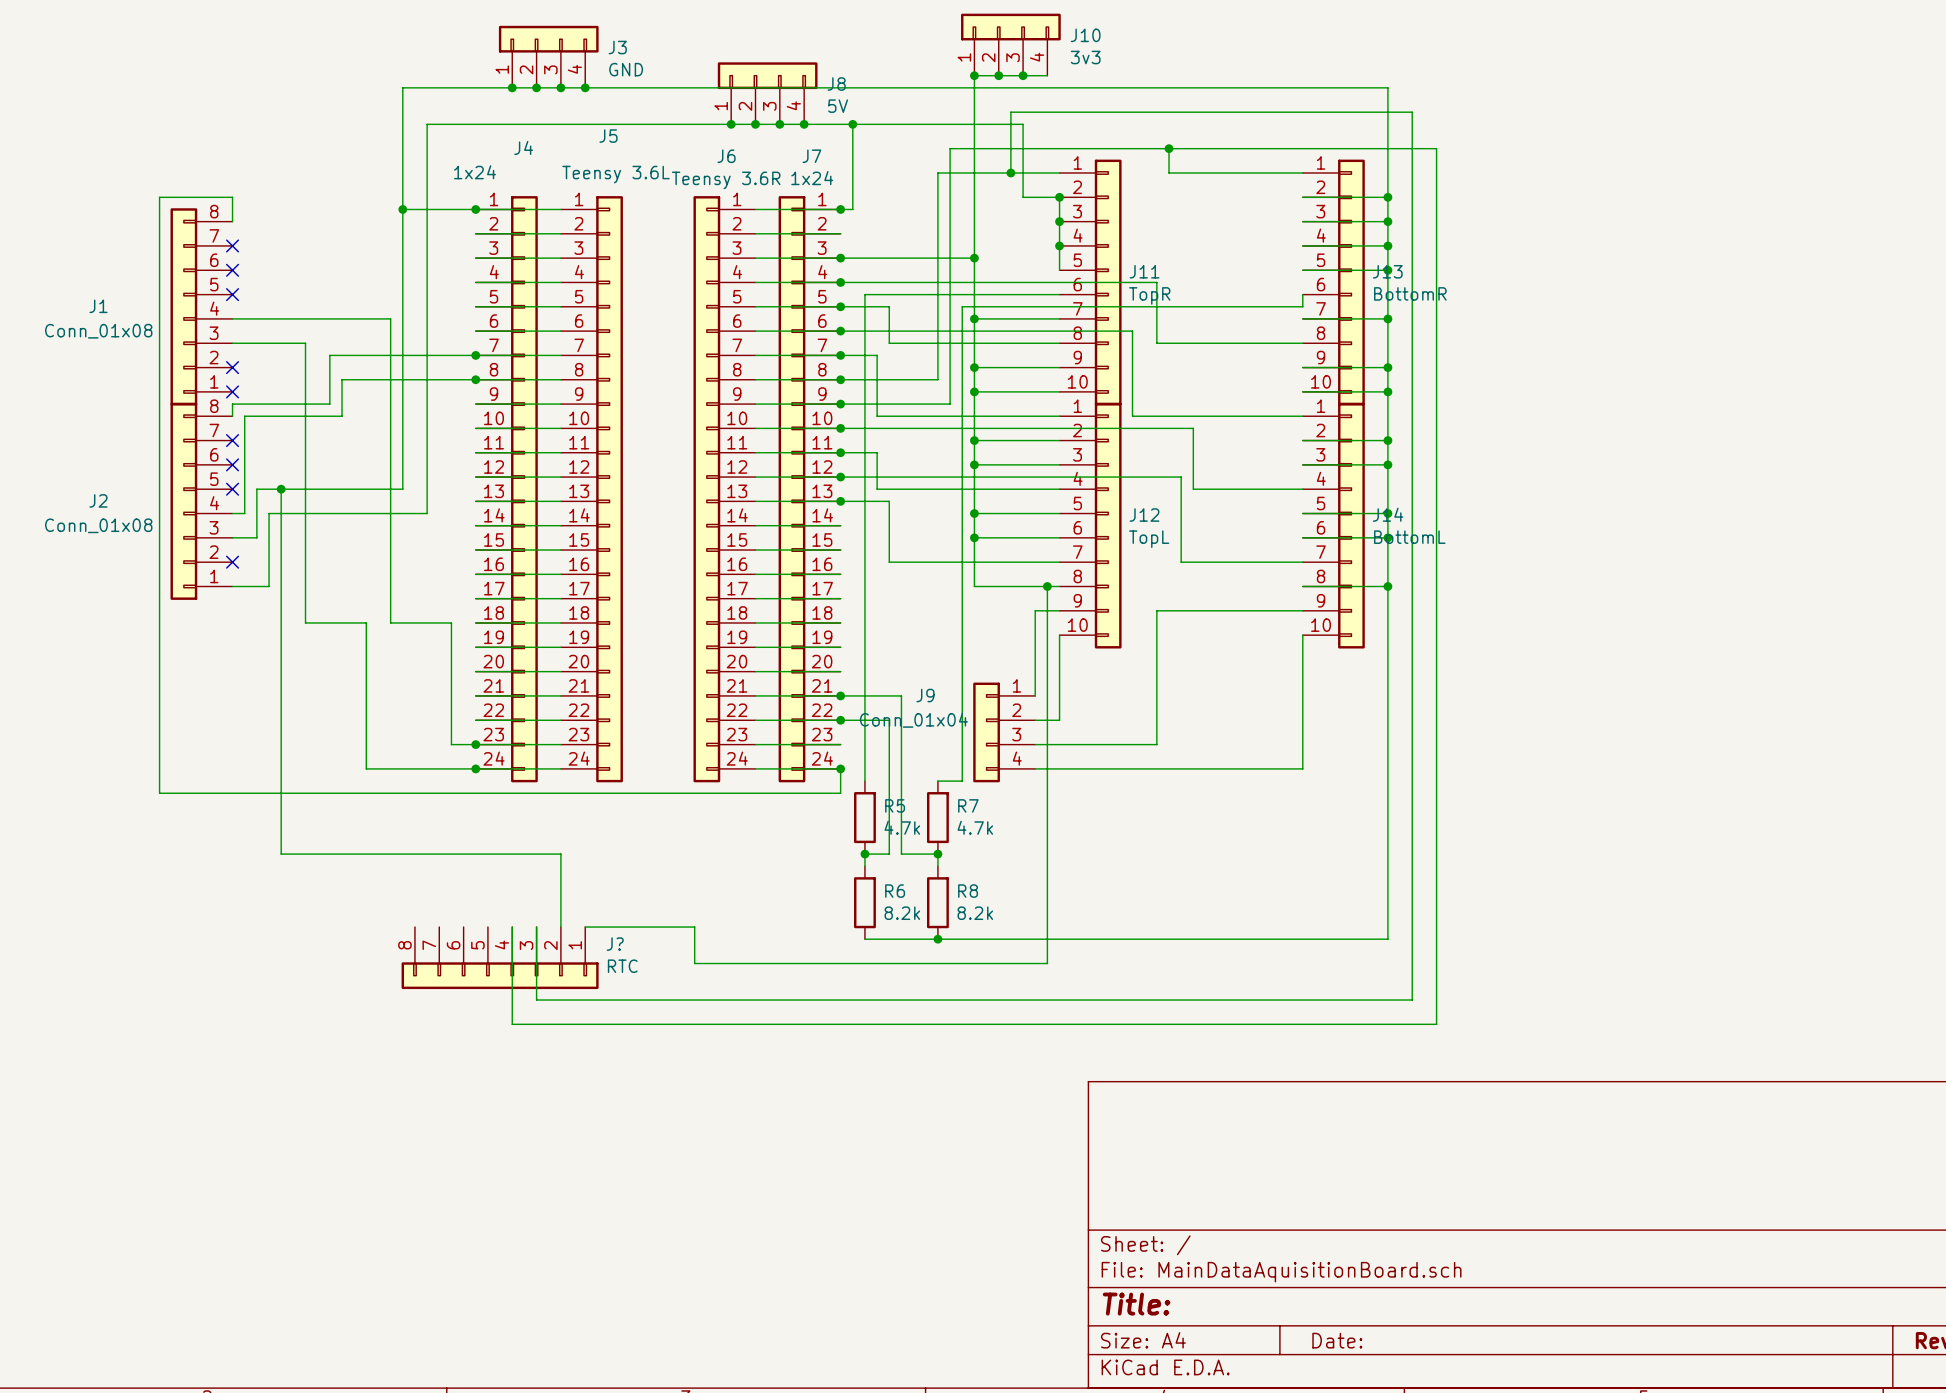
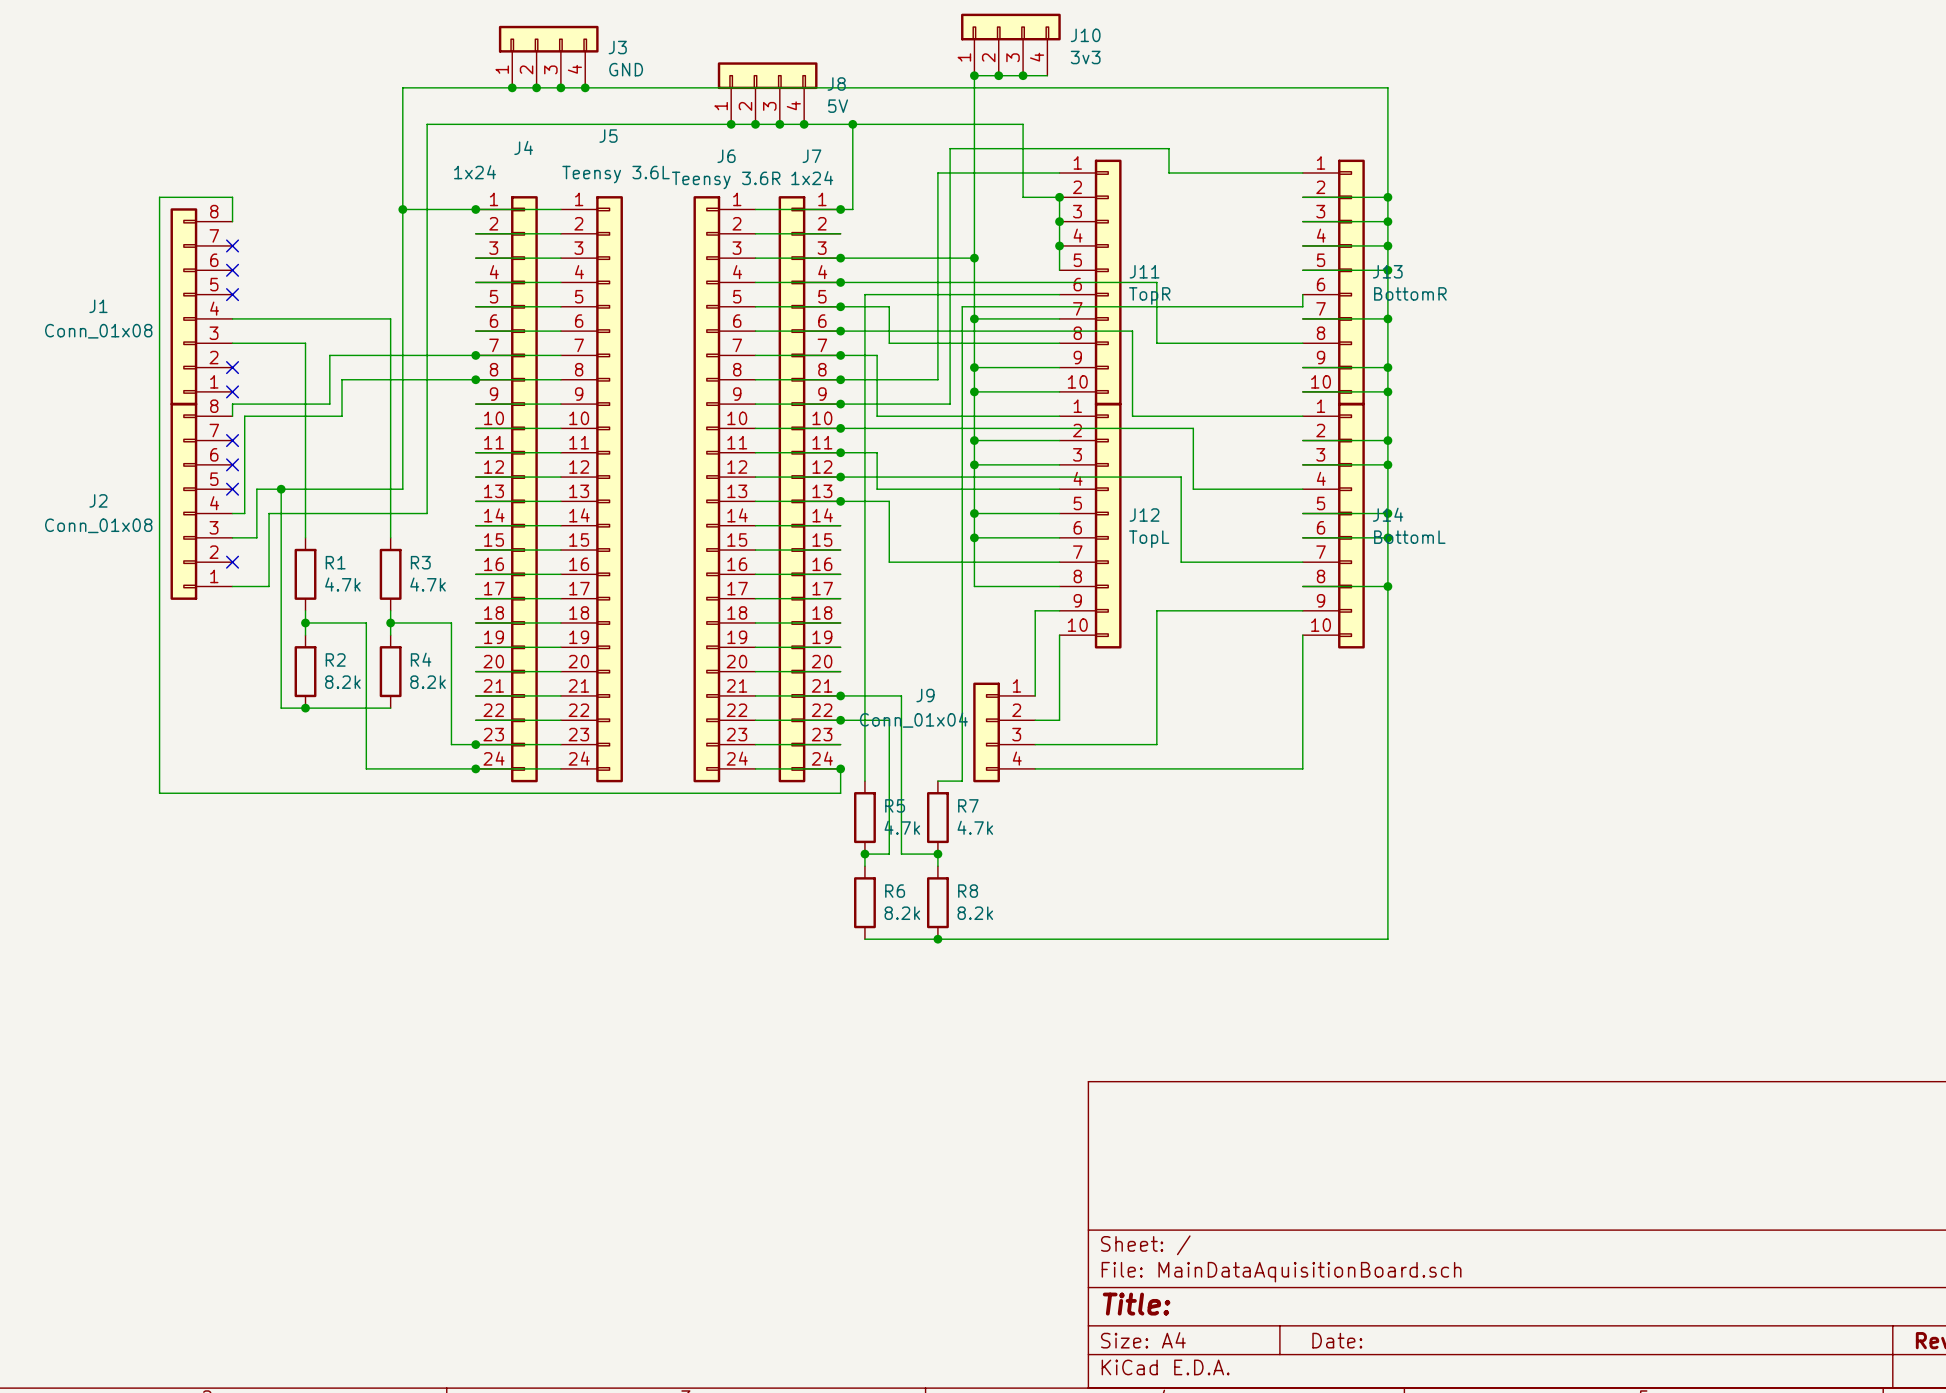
wire: (1169, 148) (1436, 148) (1436, 1024) (512, 1024) (512, 927) -> none
junction: (1169, 148) -> none
wire: (1010, 172) (1010, 112) (1412, 112) (1412, 1000) (536, 1000) (536, 927) -> none
junction: (1010, 172) -> none
wire: (305, 537) (305, 610) -> none
wire: (390, 537) (390, 610) -> none
R1: none -> 4.7k (305, 574)
R3: none -> 4.7k (390, 574)
wire: (1047, 586) (1047, 963) (694, 963) (694, 927) (585, 927) -> none
junction: (1047, 586) -> none
wire: none -> (305, 622) (305, 635)
junction: none -> (305, 622)
wire: none -> (390, 622) (390, 635)
junction: none -> (390, 622)
R2: none -> 8.2k (305, 671)
R4: none -> 8.2k (390, 671)
wire: (281, 708) (281, 854) (560, 854) (560, 927) -> (281, 708) (390, 708)
junction: none -> (305, 708)
J?: RTC (500, 958) -> none

